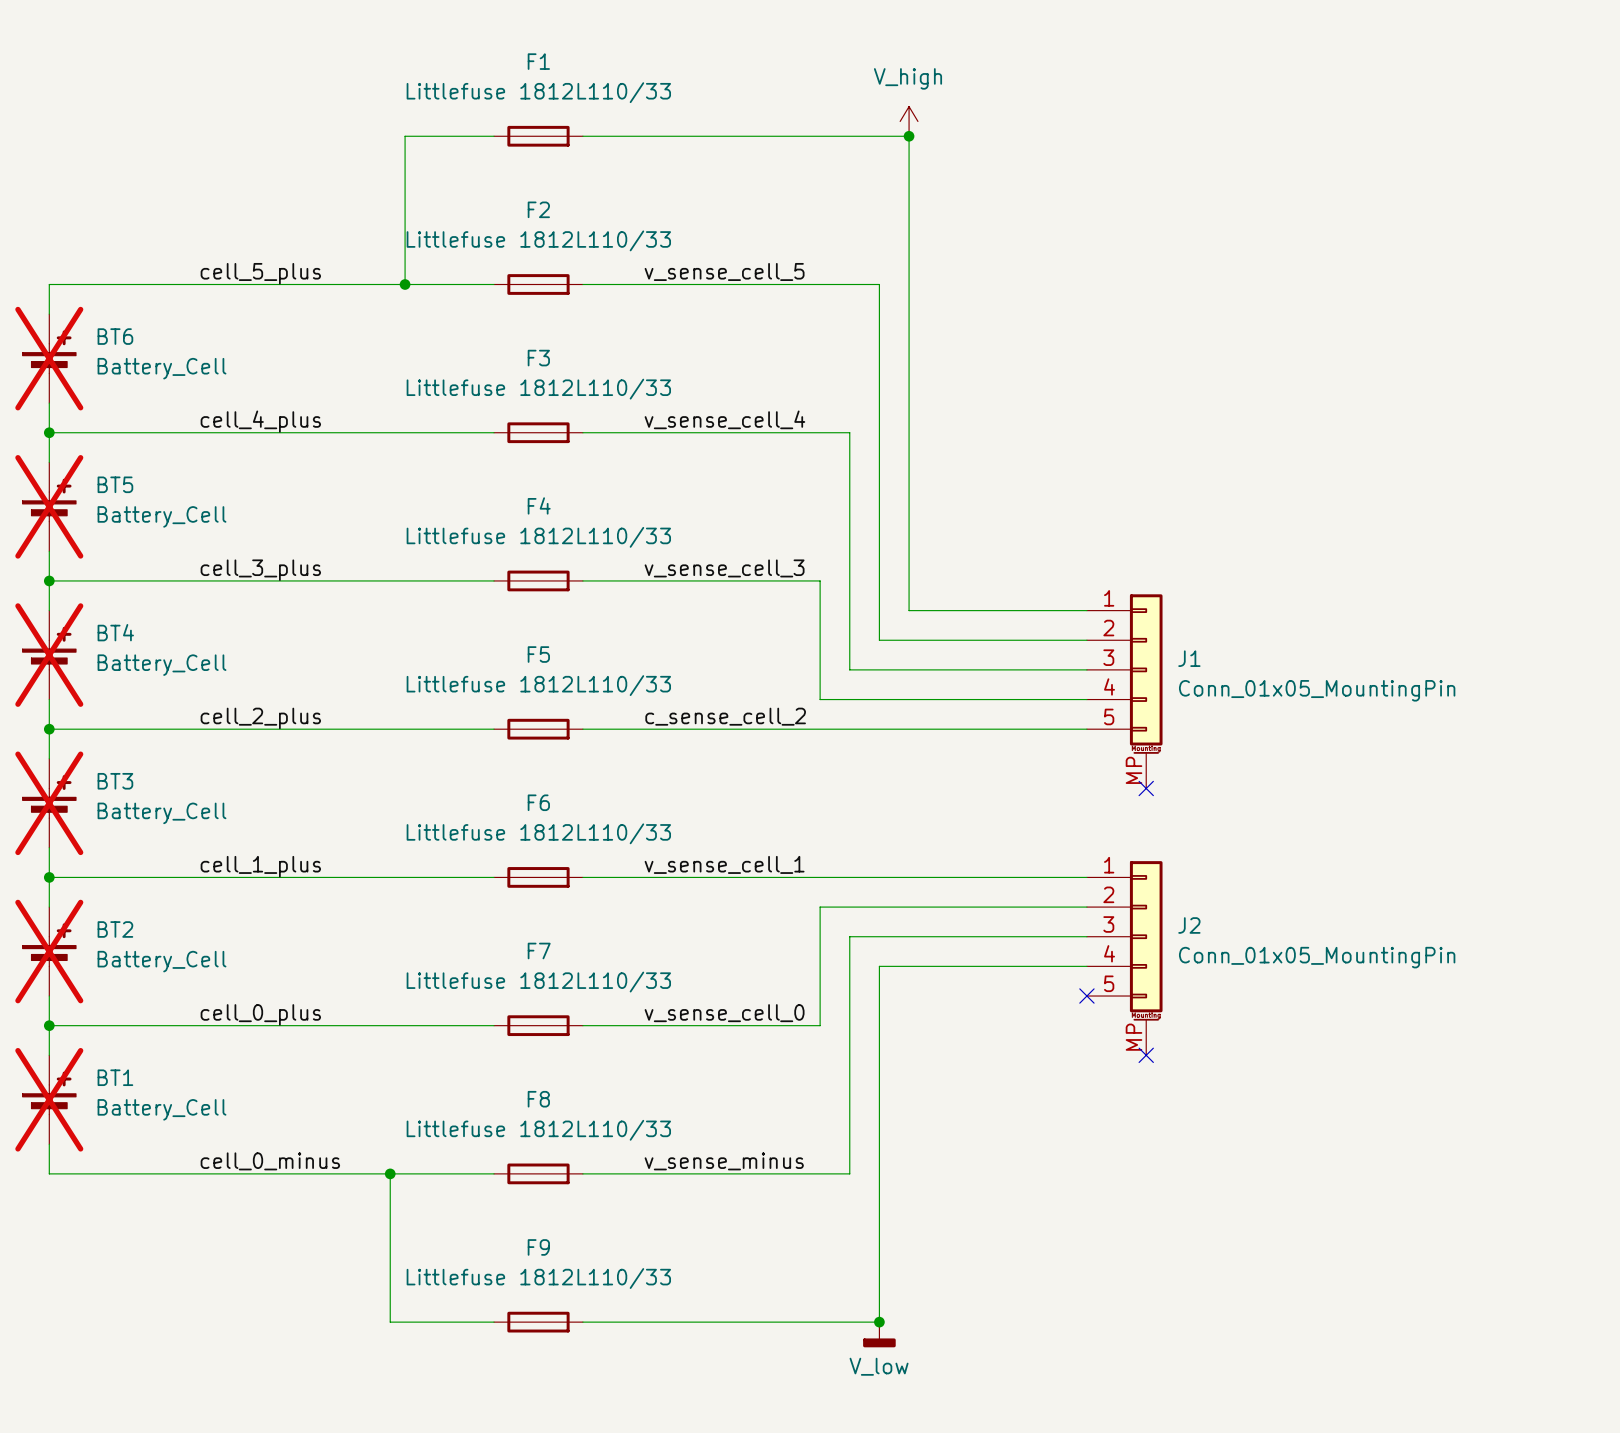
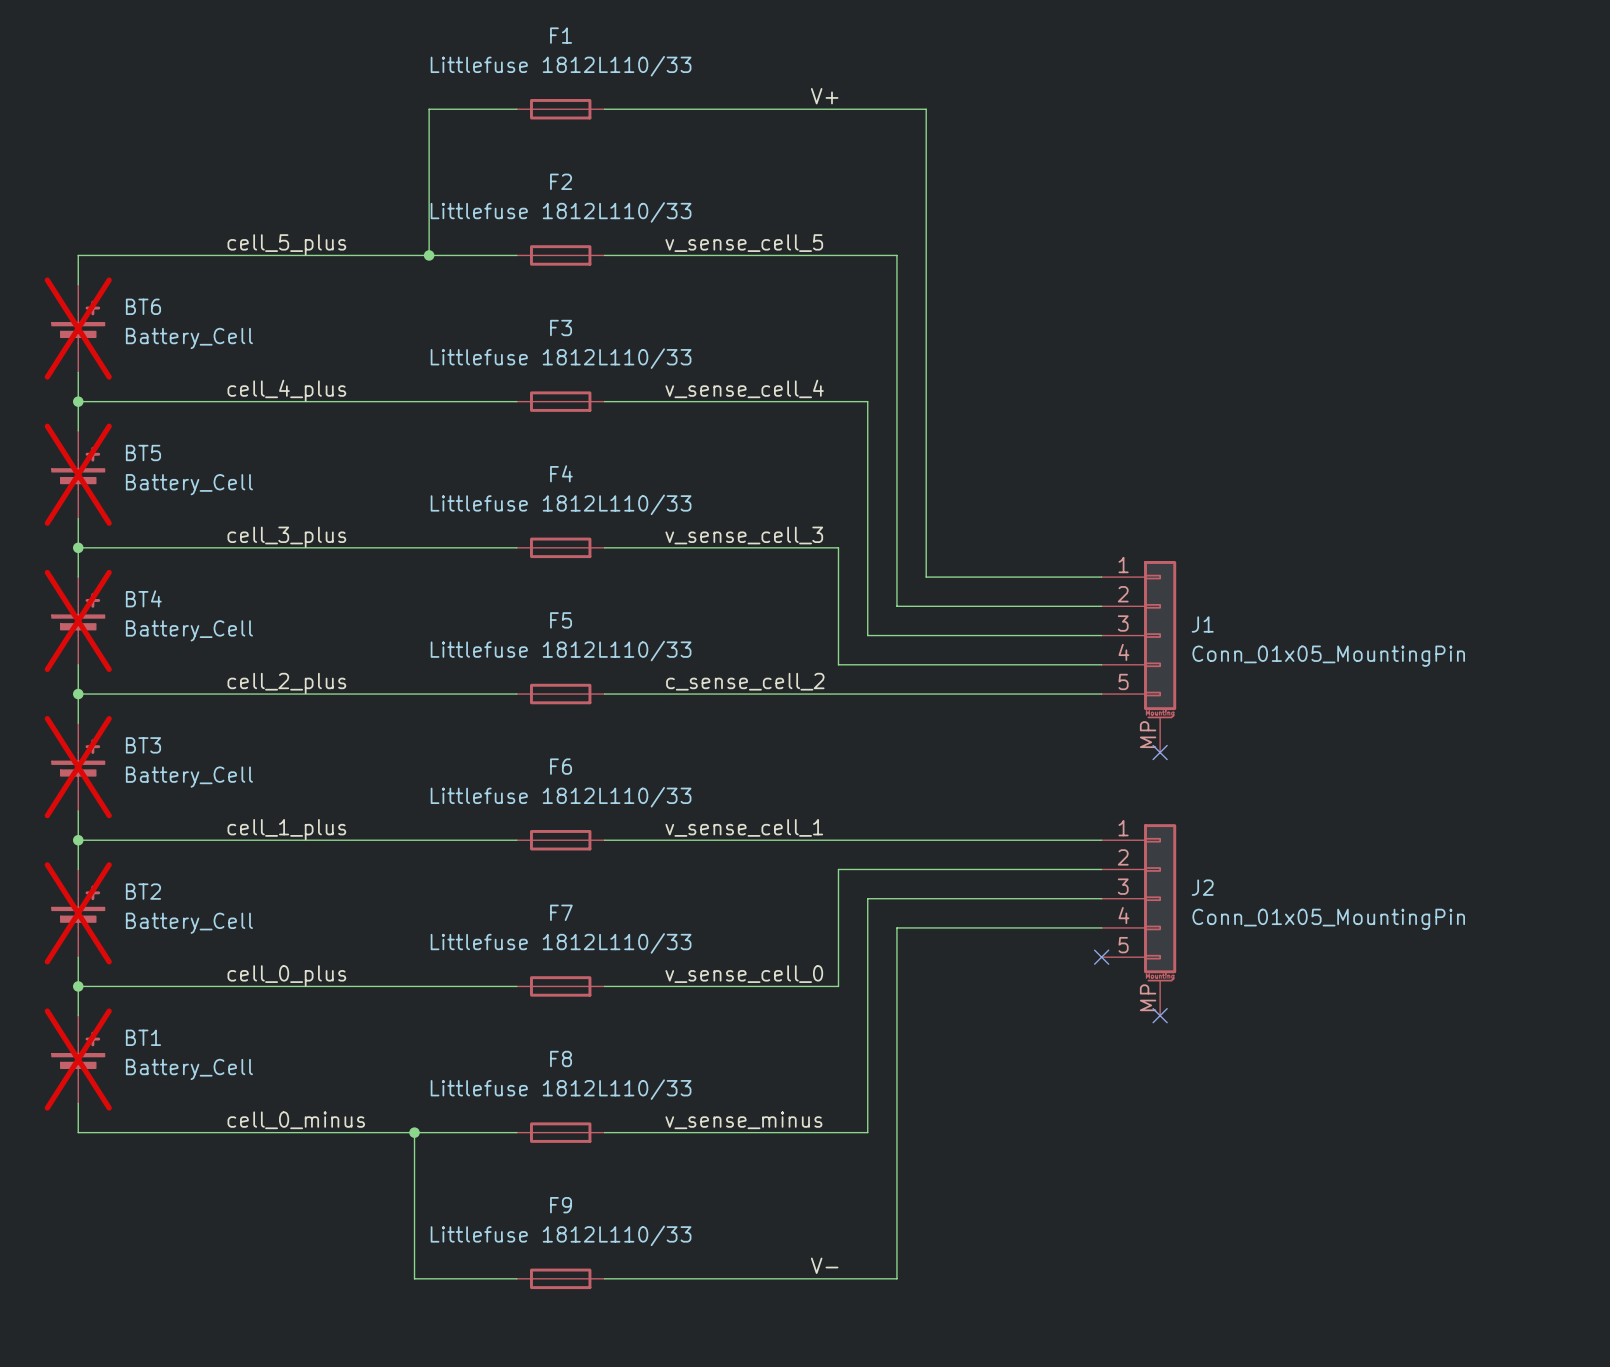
power symbol: V_high (909, 121) -> none
label: none -> V+ (824, 96)
junction: (909, 136) -> none
label: none -> V- (824, 1265)
junction: (879, 1322) -> none
power symbol: V_low (879, 1334) -> none

